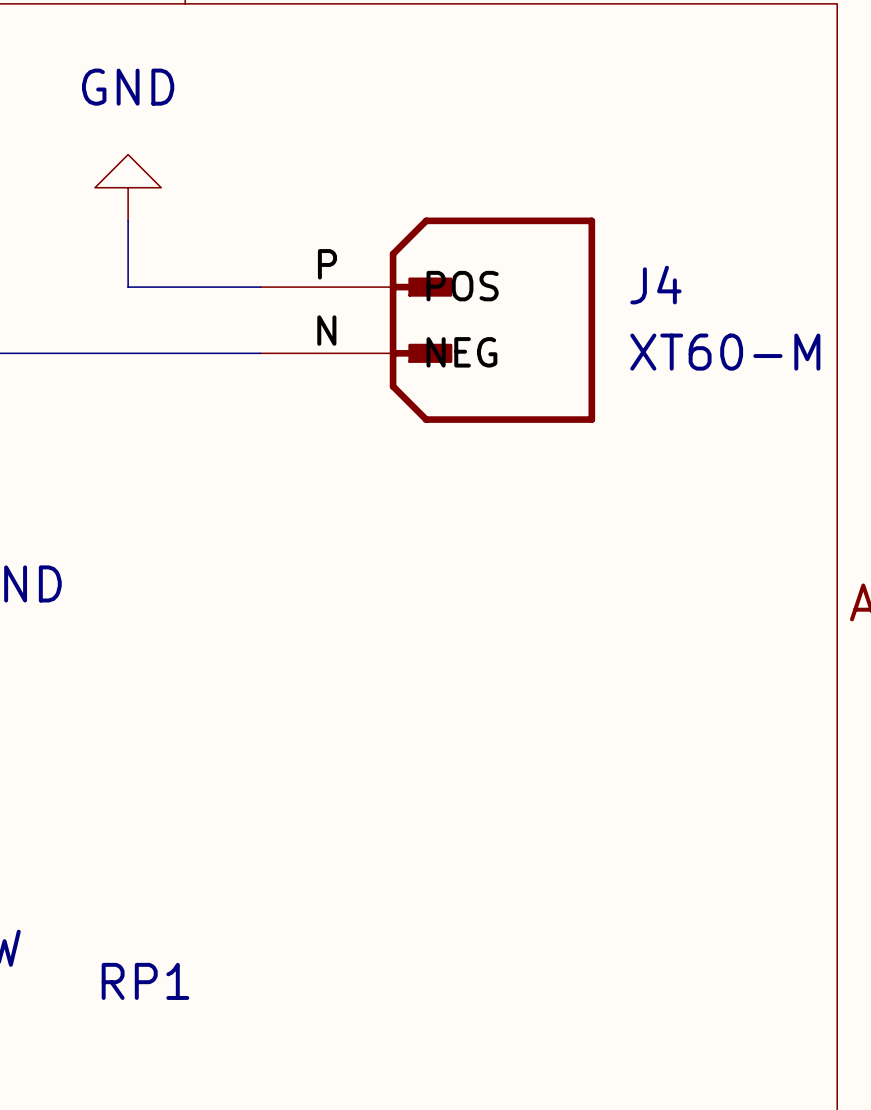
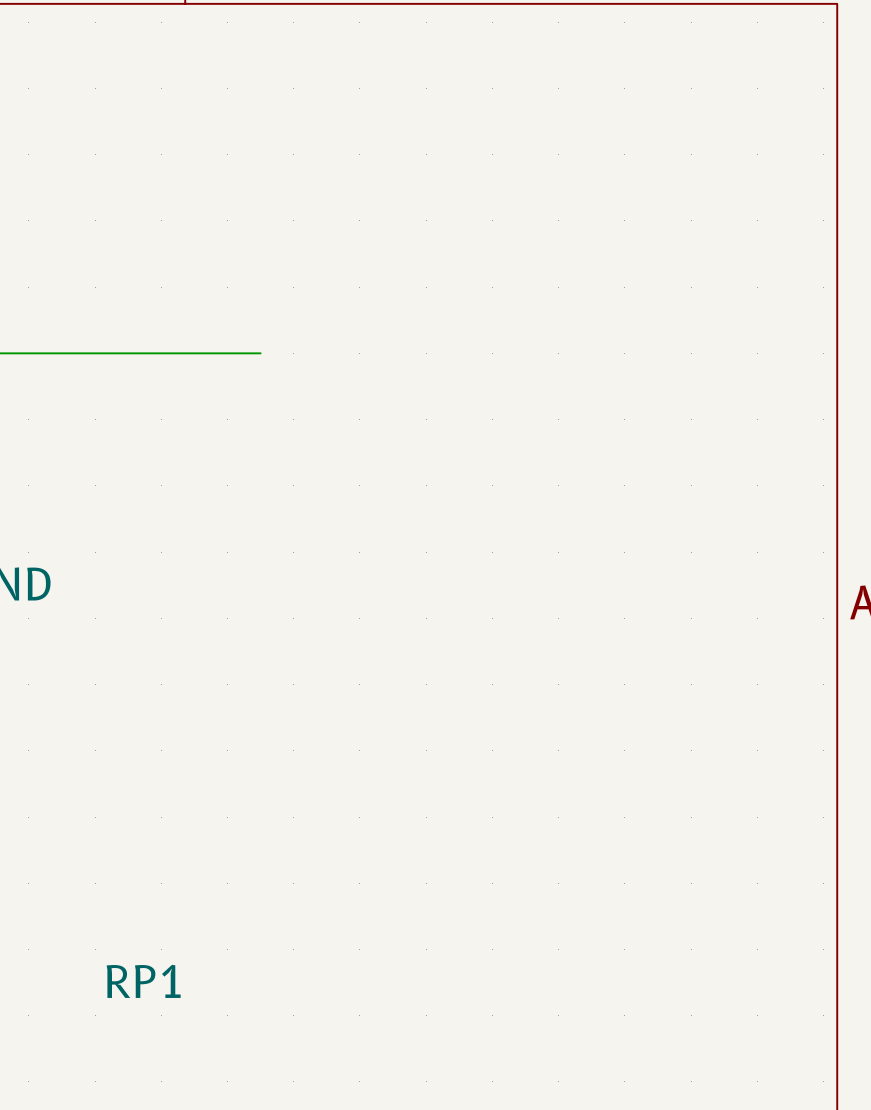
power symbol: GND (128, 187) -> none
wire: (128, 220) (128, 287) (260, 287) -> none
J4: XT60-M (427, 320) -> none

